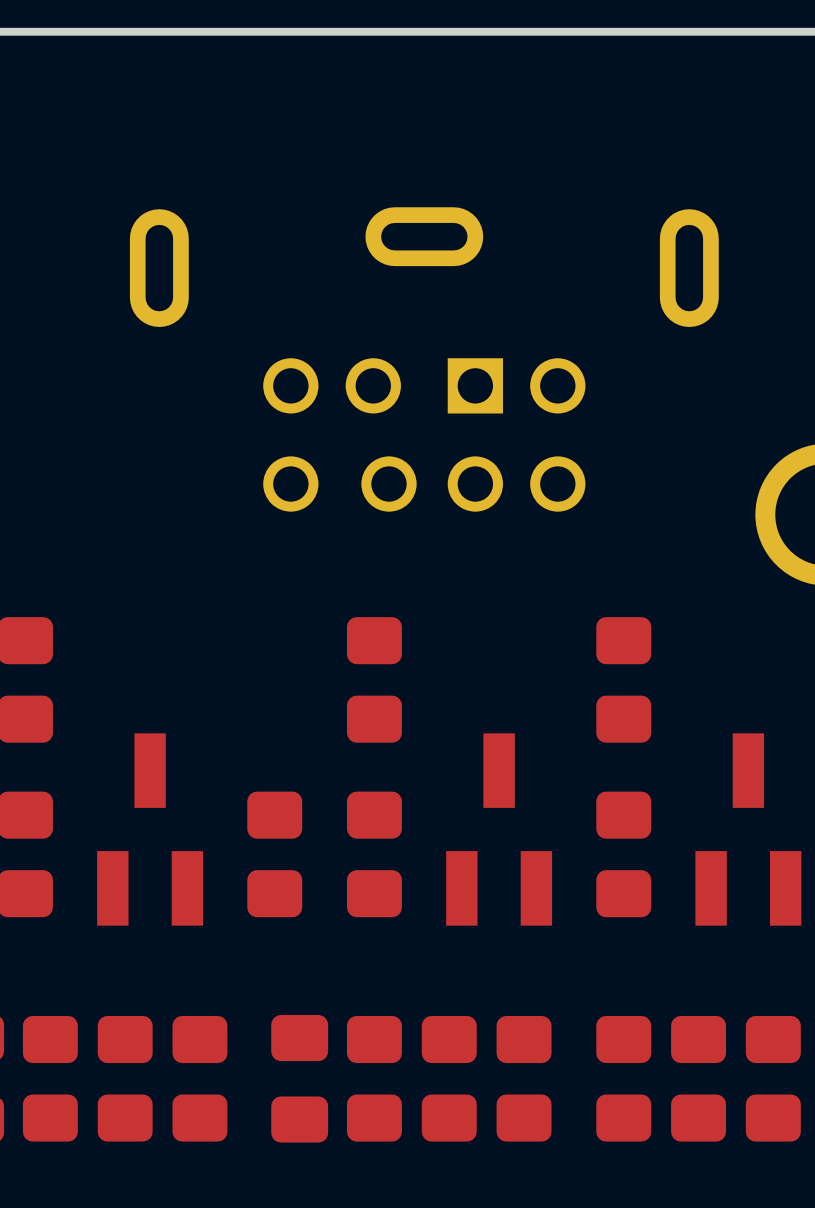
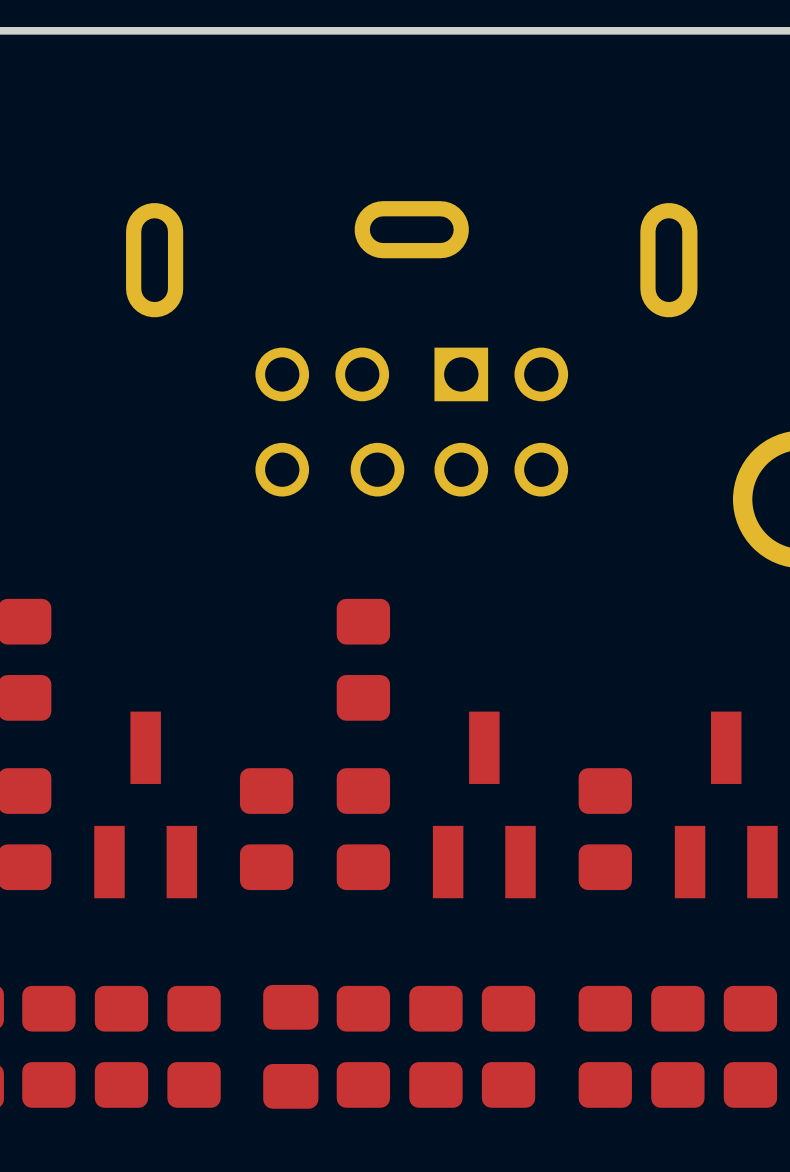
part: (623, 679) -> none

